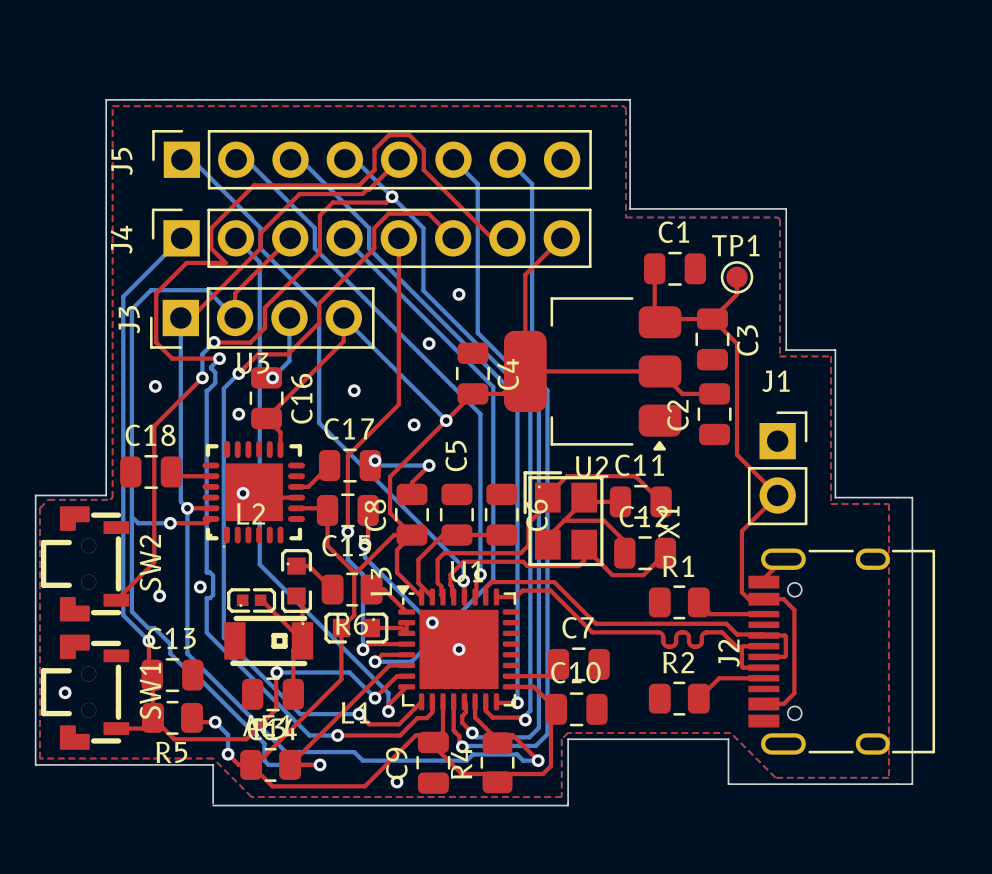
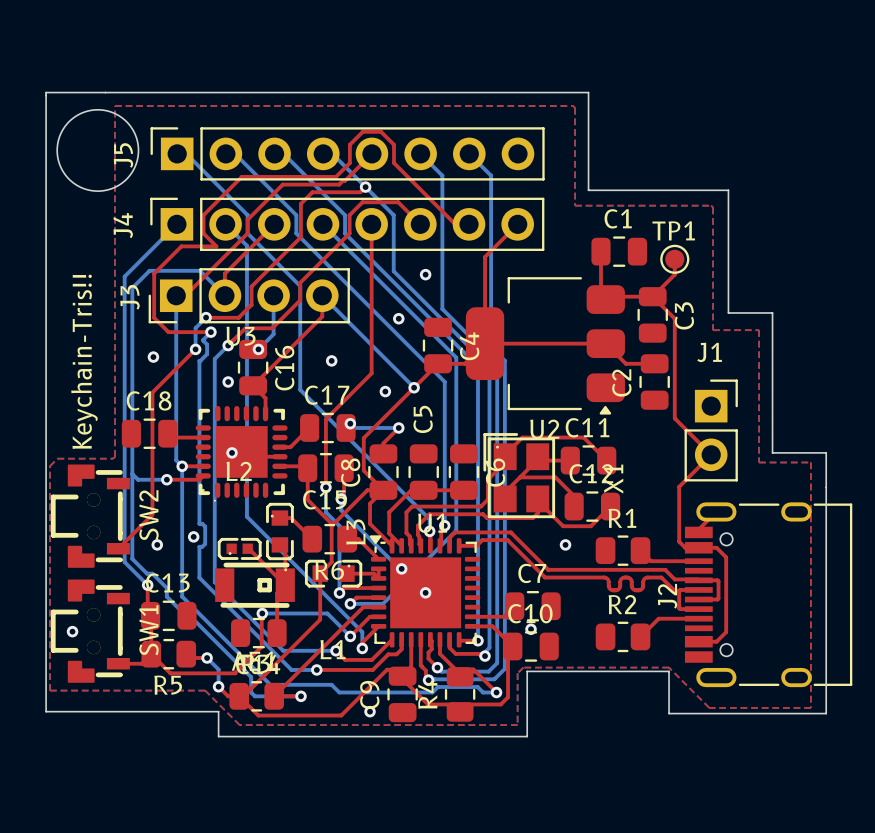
round board edge: none -> [56, 109, 139, 192]
text: none -> Keychain-Tris!! (84, 361)
board edge: (35, 495) (106, 495) (106, 99) (630, 99) (630, 208) (786, 208) (786, 350) (835, 350) (835, 497) (912, 497) (912, 784) (905, 784) -> (46, 454) (46, 92) (588, 92) (588, 190) (728, 190) (728, 312) (772, 312) (772, 452) (826, 452) (826, 713)
via: none -> (565, 544)
via: none -> (531, 629)
board edge: (35, 764) (213, 764) (213, 803) -> none
board edge: (730, 784) (728, 784) (728, 739) (568, 739) (568, 805) (213, 805) -> (669, 713) (669, 671) (527, 671) (527, 736) (218, 736) (218, 711) (46, 711) (46, 696)

